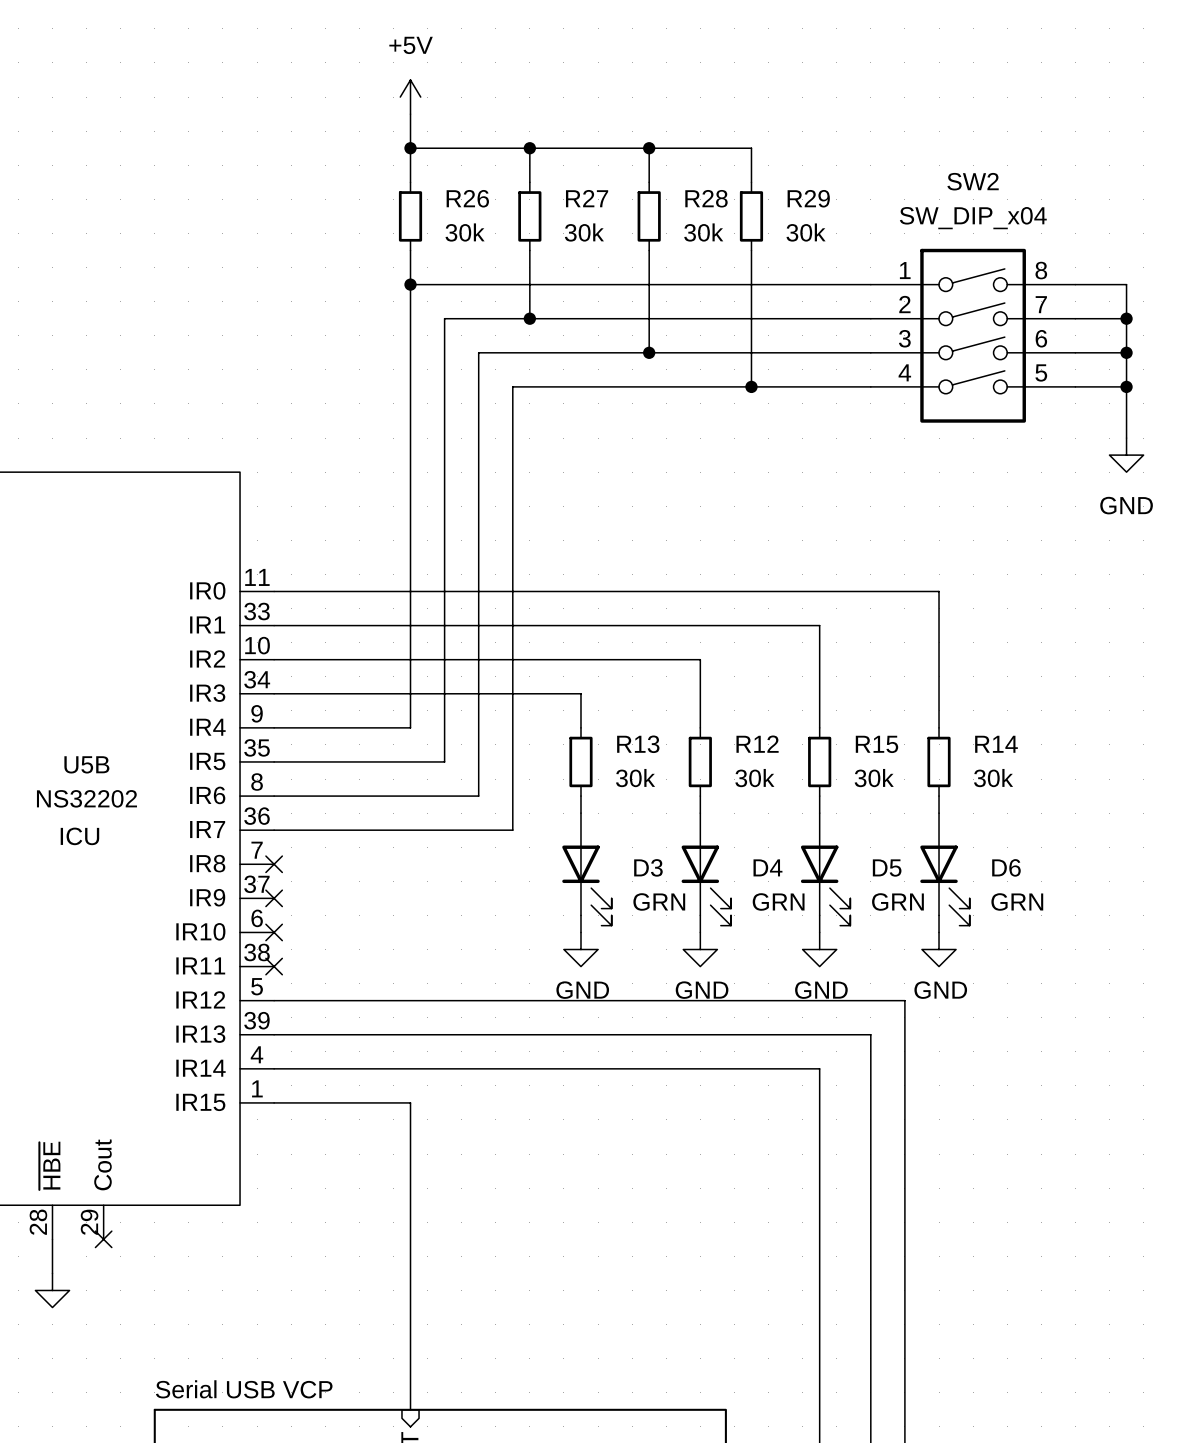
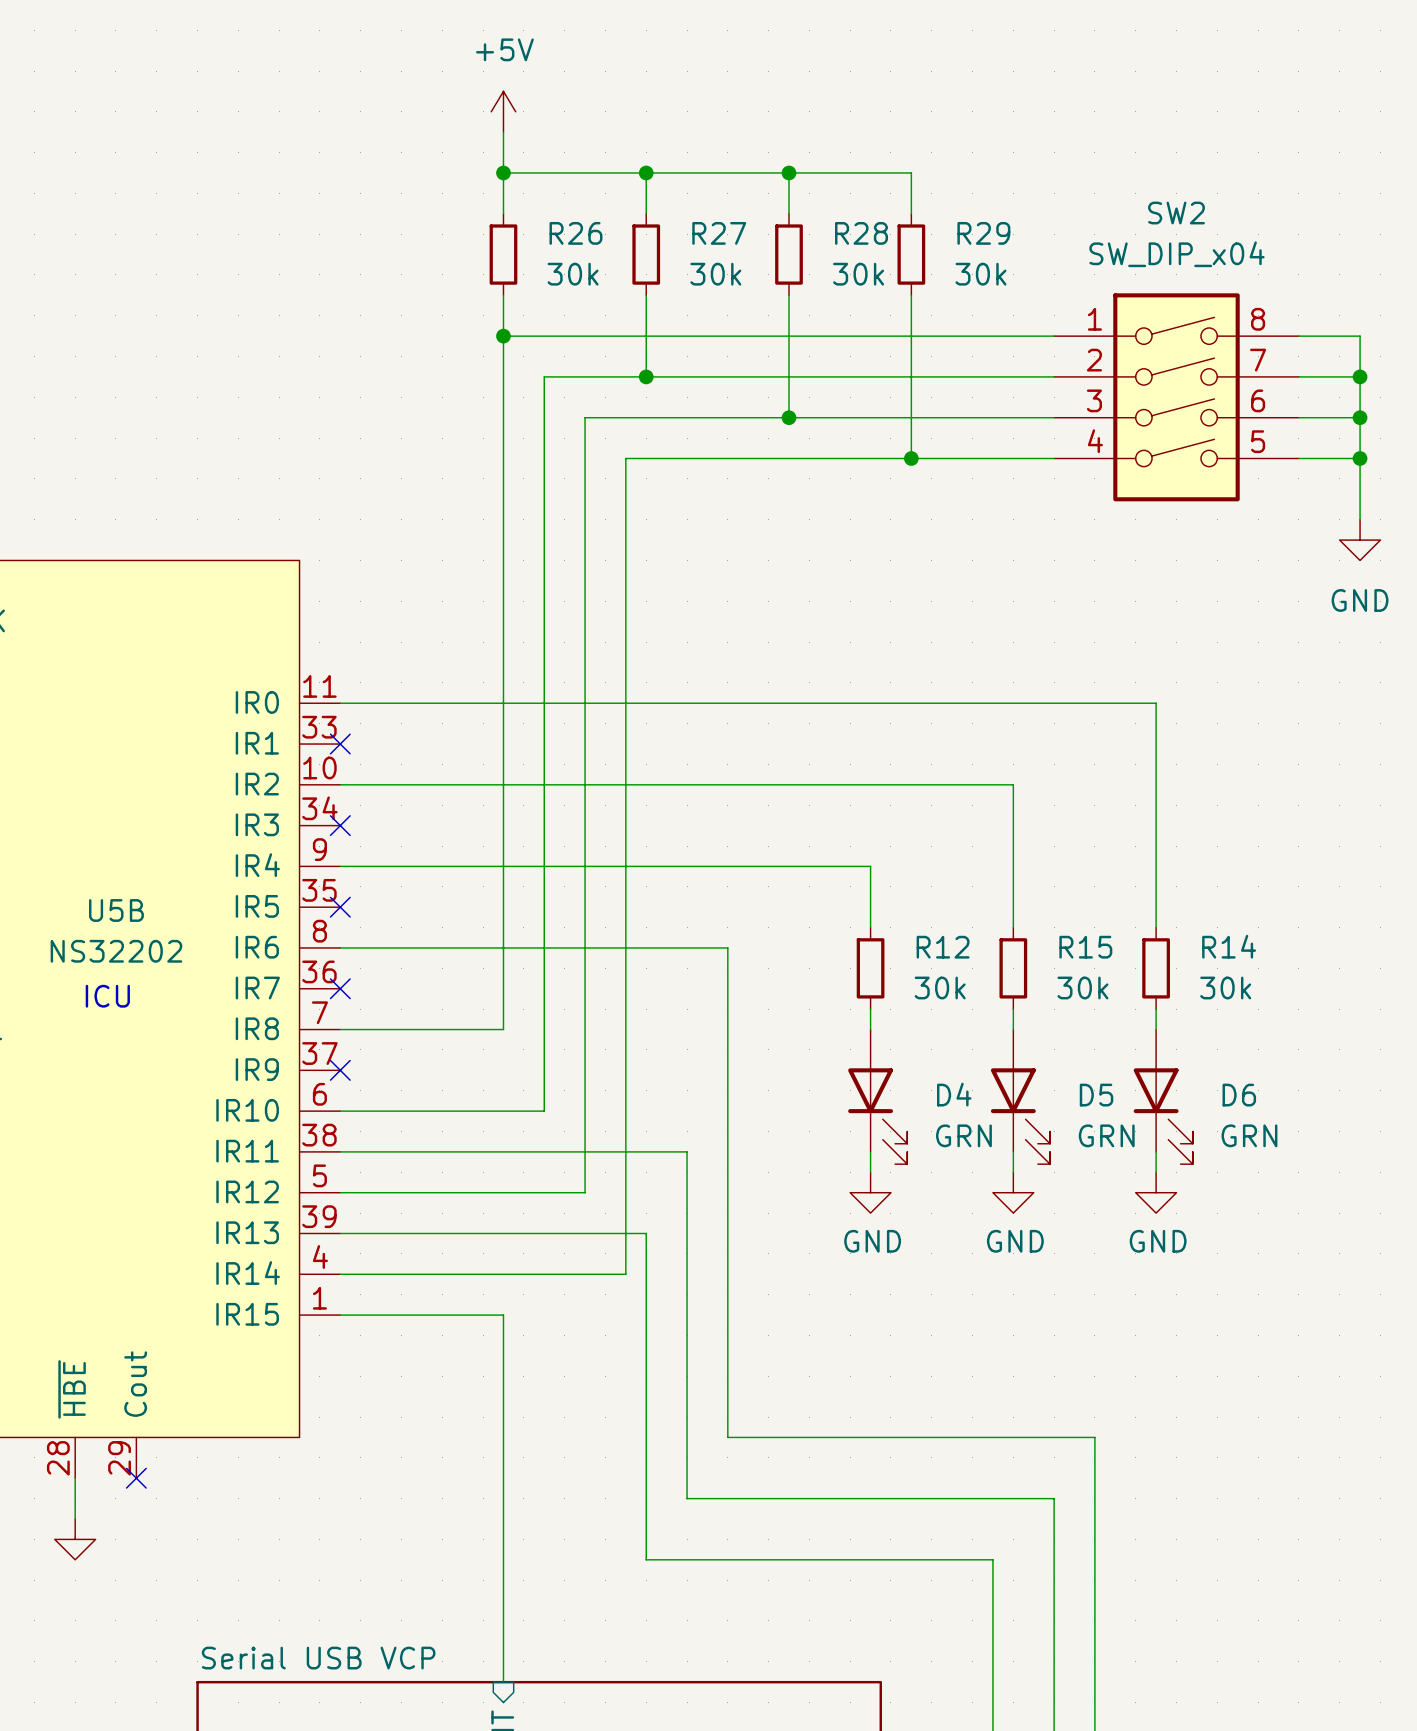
wire: (939, 591) (939, 727) -> (1135, 703) (1156, 703) (1156, 927)
wire: (274, 625) (819, 625) (819, 727) -> none
no-connect mark: none -> (340, 744)
wire: (700, 659) (700, 727) -> (850, 784) (1013, 784) (1013, 927)
wire: (274, 693) (580, 693) (580, 727) -> none
no-connect mark: none -> (340, 825)
wire: (274, 761) (444, 761) -> (340, 1111) (544, 1111) (544, 907)
no-connect mark: none -> (340, 907)
R13: 30k (580, 761) -> none
R12 position: (700, 761) -> (870, 968)
R15 position: (819, 761) -> (1013, 968)
R14 position: (939, 761) -> (1156, 968)
wire: none -> (870, 927) (870, 866) (503, 866) (503, 1029) (340, 1029)
wire: (580, 796) (580, 813) -> none
wire: (700, 796) (700, 813) -> (870, 1009) (870, 1029)
wire: (819, 796) (819, 813) -> (1013, 1009) (1013, 1029)
wire: (939, 796) (939, 813) -> (1156, 1009) (1156, 1029)
wire: (274, 830) (512, 830) -> (625, 1274) (625, 988)
no-connect mark position: (274, 864) -> (340, 988)
D3: GRN (586, 869) -> none
D4 position: (706, 869) -> (877, 1096)
D5 position: (825, 869) -> (1020, 1096)
D6 position: (944, 869) -> (1163, 1096)
wire: (580, 915) (580, 932) -> none
wire: (700, 915) (700, 932) -> (870, 1151) (870, 1172)
wire: (819, 915) (819, 932) -> (1013, 1151) (1013, 1172)
wire: (939, 915) (939, 932) -> (1156, 1151) (1156, 1172)
no-connect mark: (274, 932) -> none
power symbol: GND (580, 949) -> none
power symbol position: GND (700, 949) -> GND (870, 1192)
power symbol position: GND (819, 949) -> GND (1013, 1192)
power symbol position: GND (939, 949) -> GND (1156, 1192)
no-connect mark: (274, 966) -> none
wire: (478, 1000) (904, 1000) (904, 1205) -> (585, 1192) (585, 947) (727, 947) (727, 1437) (1094, 1437)
wire: (529, 1034) (870, 1034) (870, 1256) -> (340, 1151) (687, 1151) (687, 1498) (1054, 1498)
wire: (512, 1068) (819, 1068) (819, 1307) -> (646, 1233) (646, 1559) (992, 1559)

